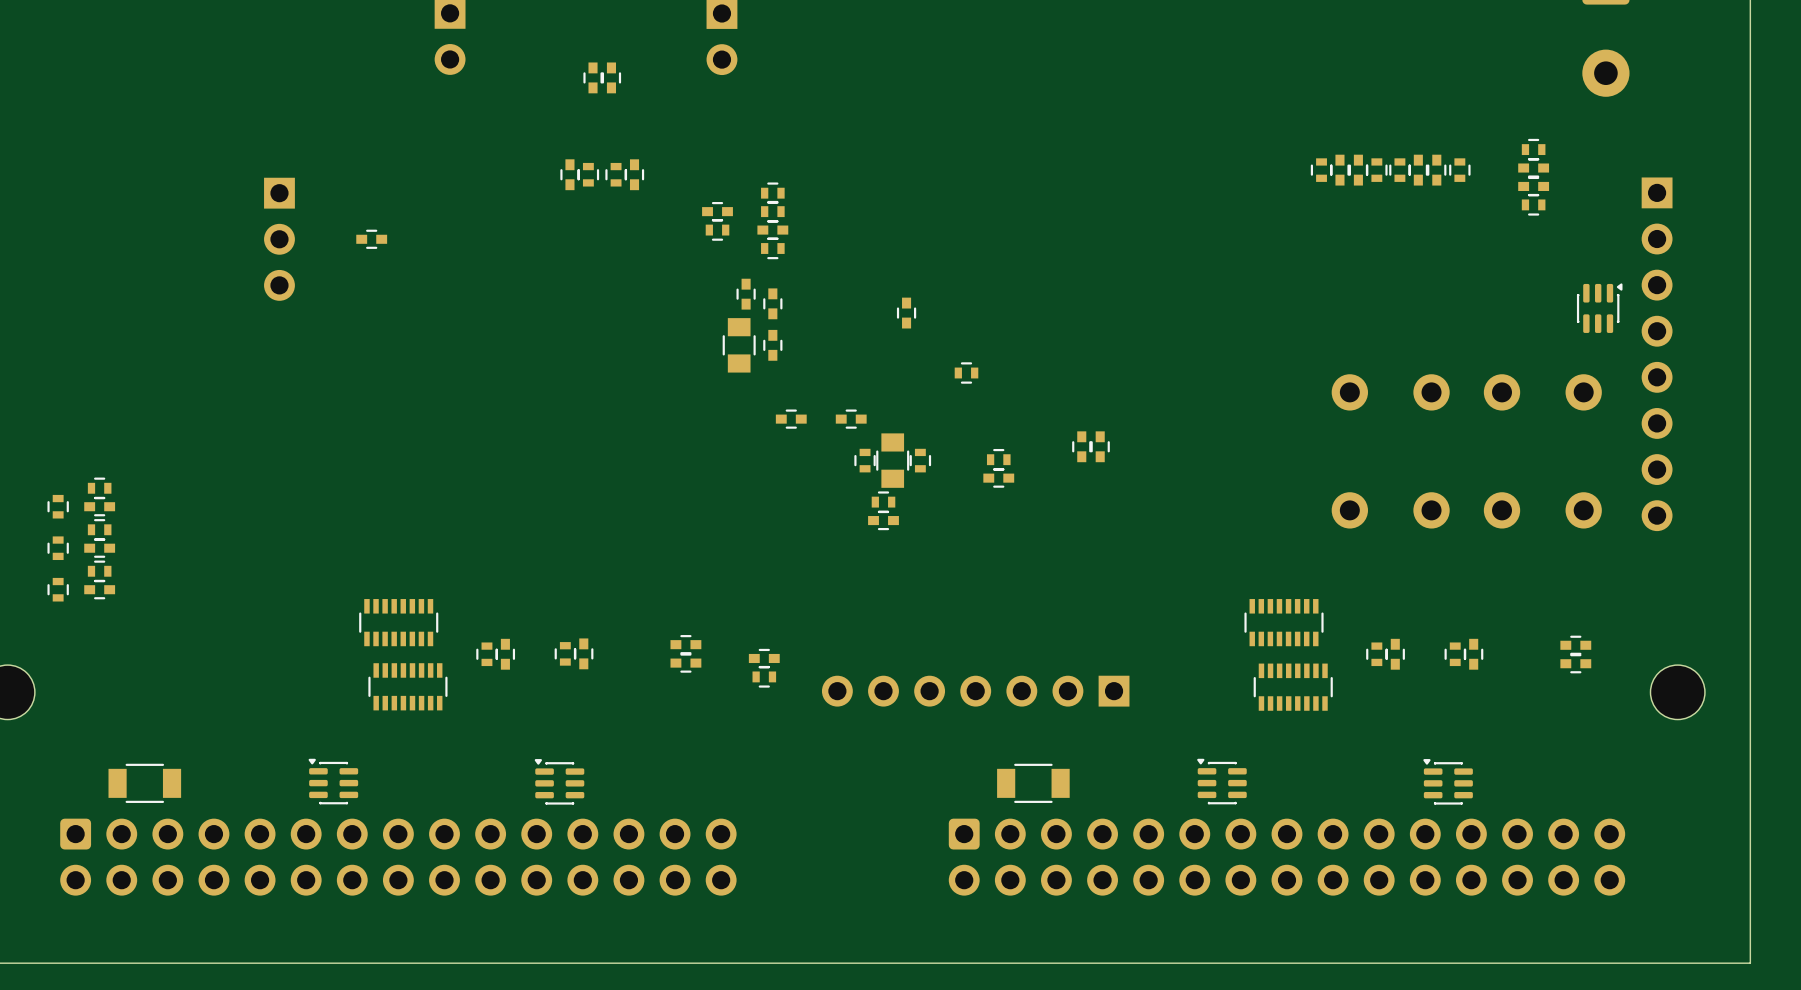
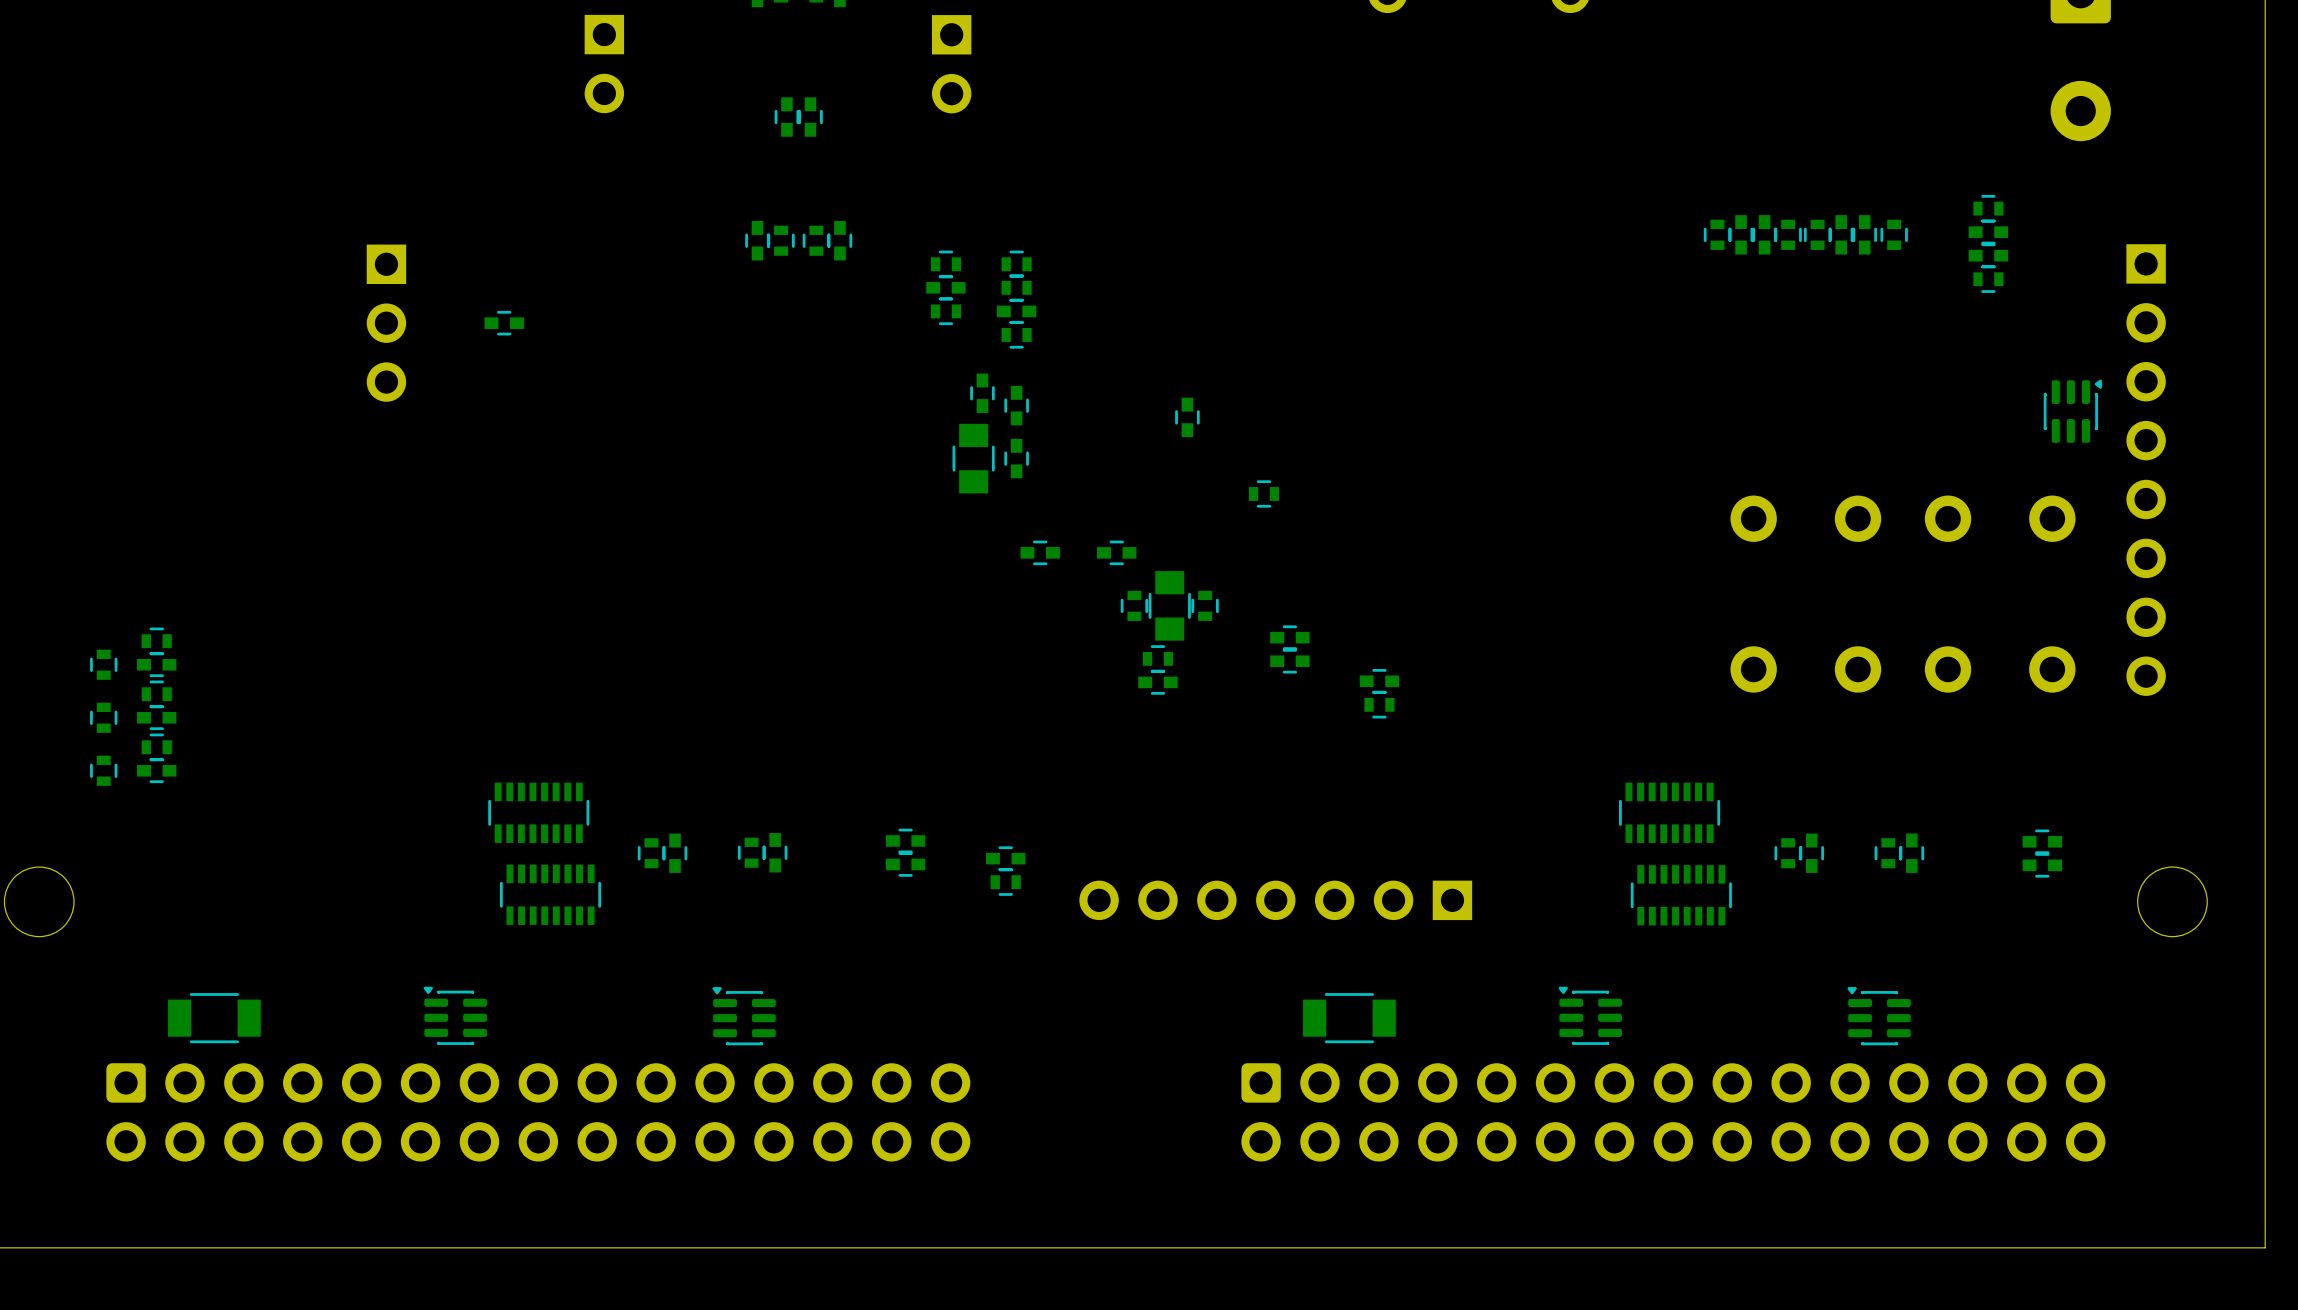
part: none -> (945, 264)
part: (1081, 446) -> none
part: (1100, 446) -> none
part position: (998, 459) -> (1379, 704)
part: (998, 478) -> none
part: none -> (1289, 637)
part: none -> (1289, 661)
part: none -> (1379, 681)

